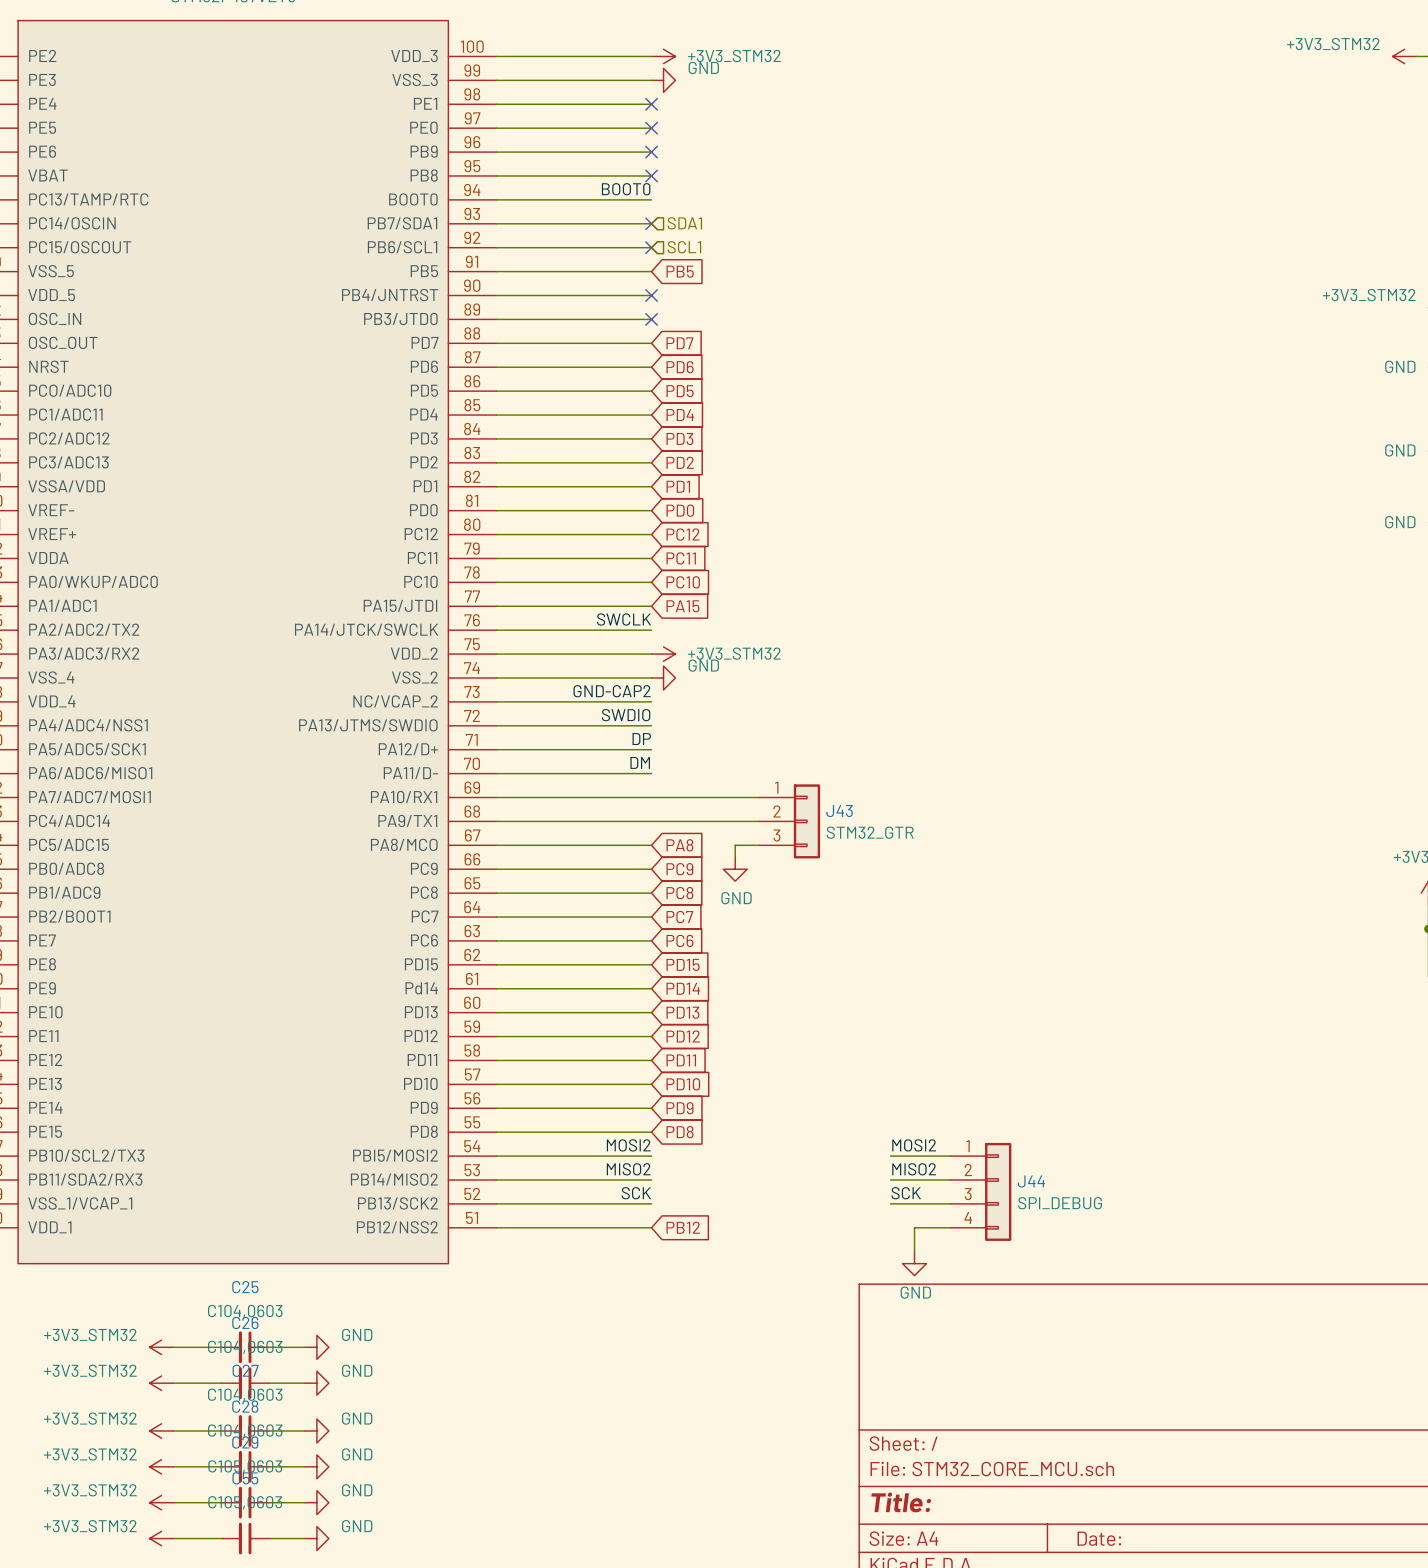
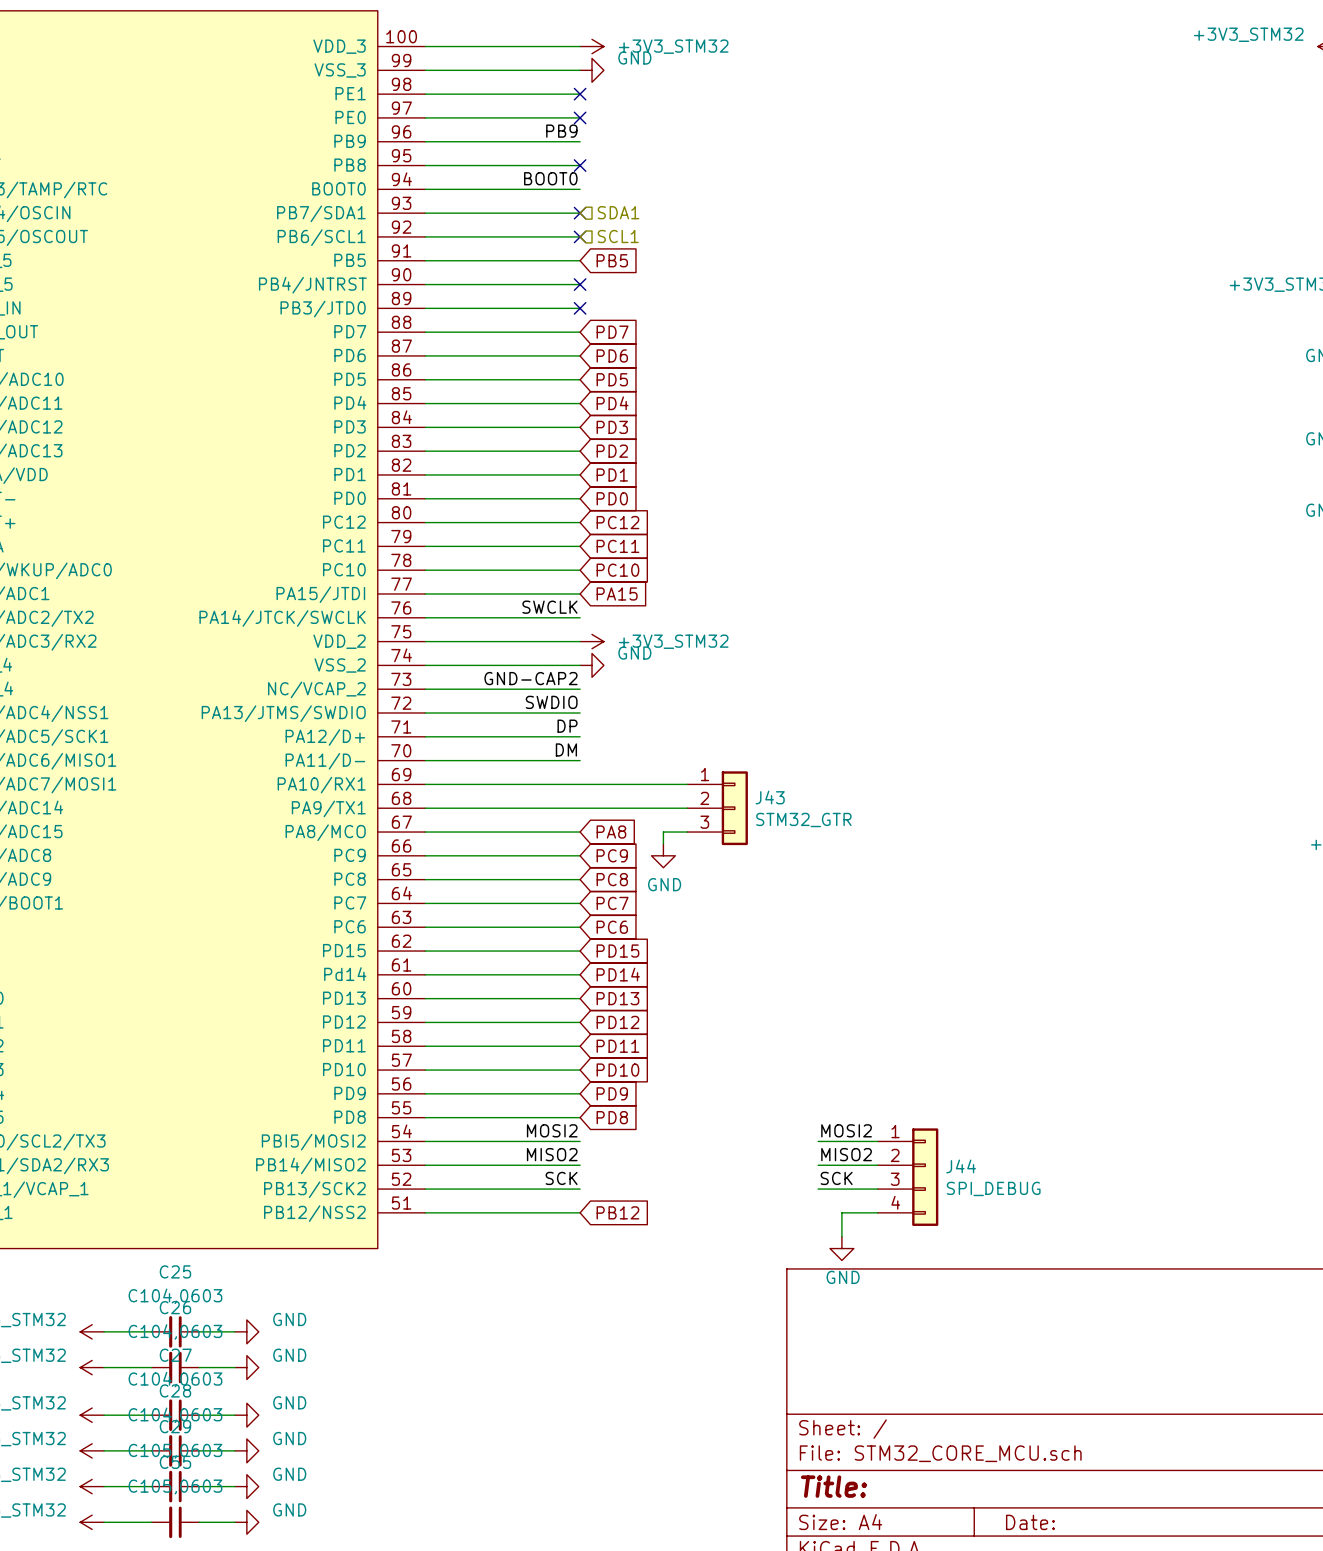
label: none -> PB9 (561, 131)
no-connect mark: (651, 152) -> none

